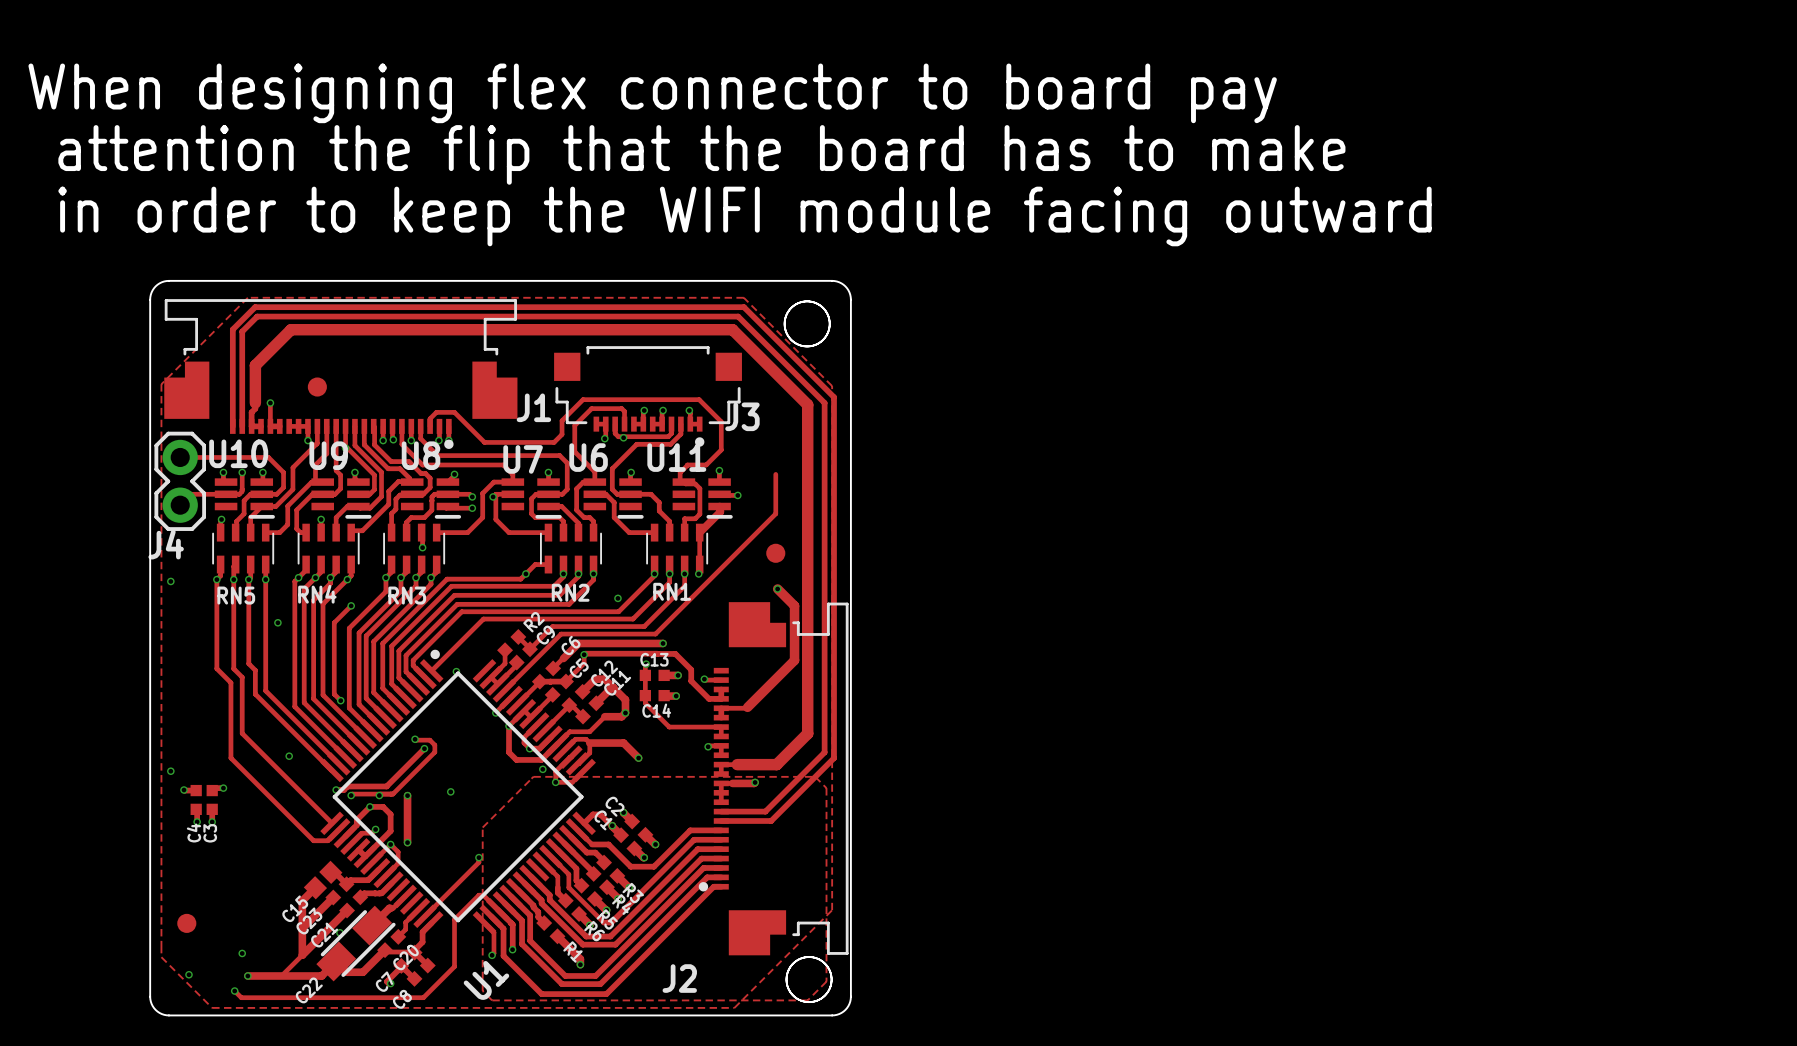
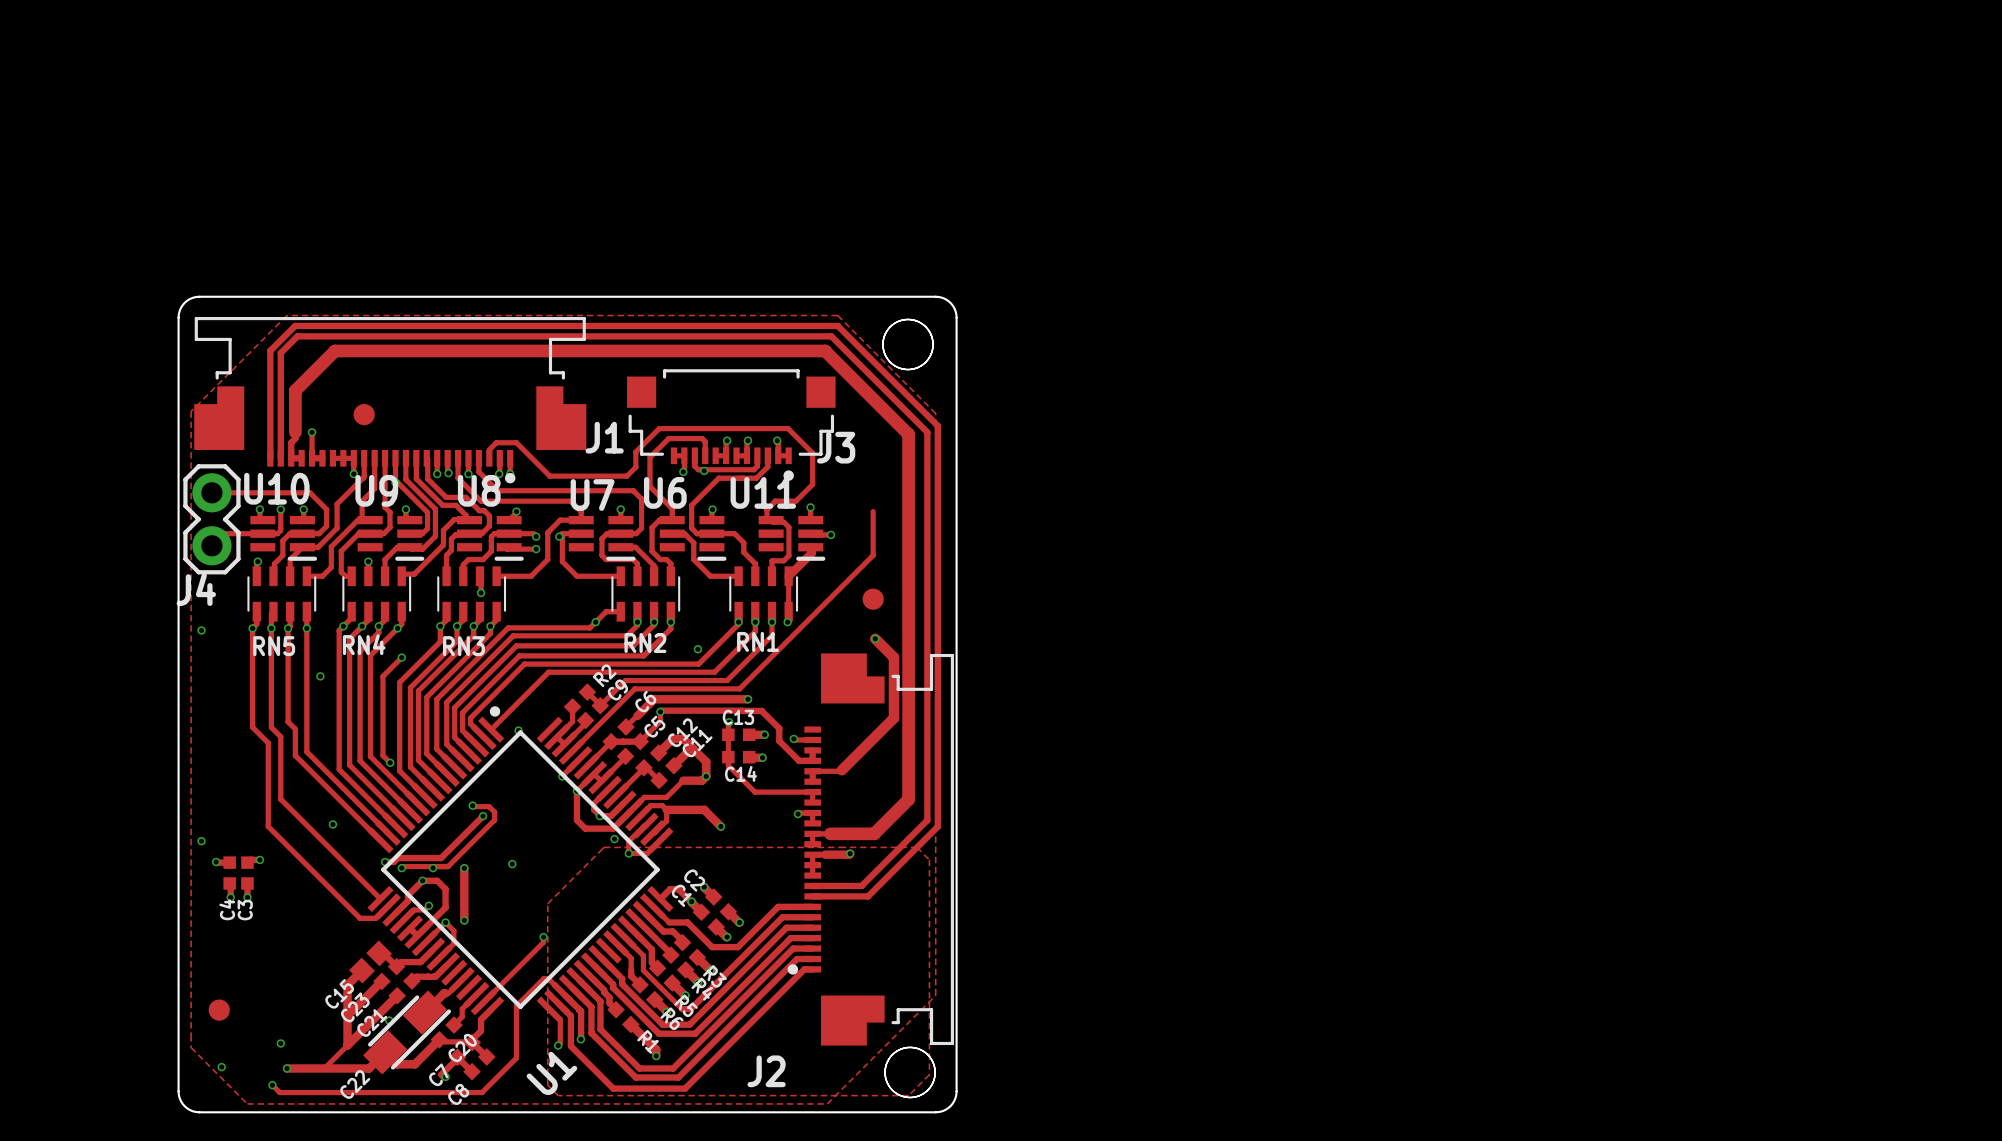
text: When designing flex connector to board pay (652, 93) -> none
text: attention the flip that the board has to make (701, 154) -> none
text: in order to keep the WIFI module facing outward (745, 216) -> none

